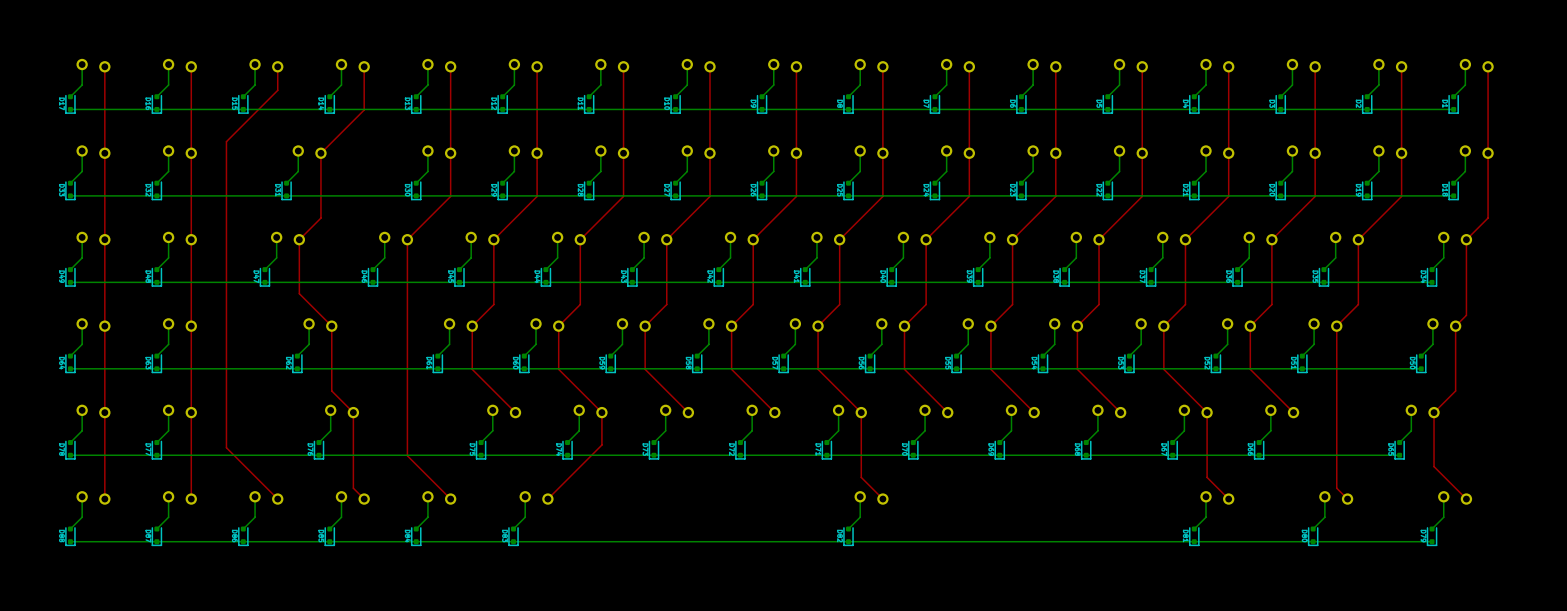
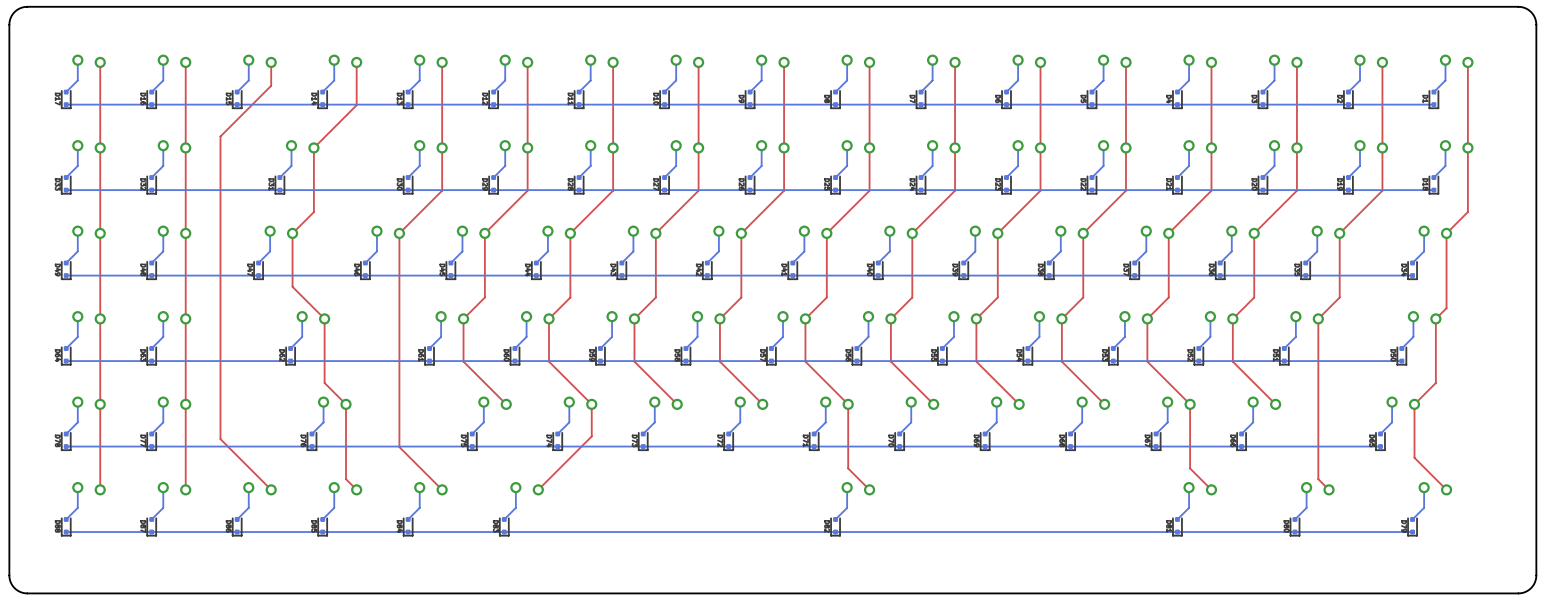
board edge: none -> (1518, 6) (20, 8) (13, 13) (9, 24) (10, 582) (18, 591) (27, 593) (1525, 592) (1532, 586) (1536, 575) (1536, 24) (1531, 12) (1518, 6)

